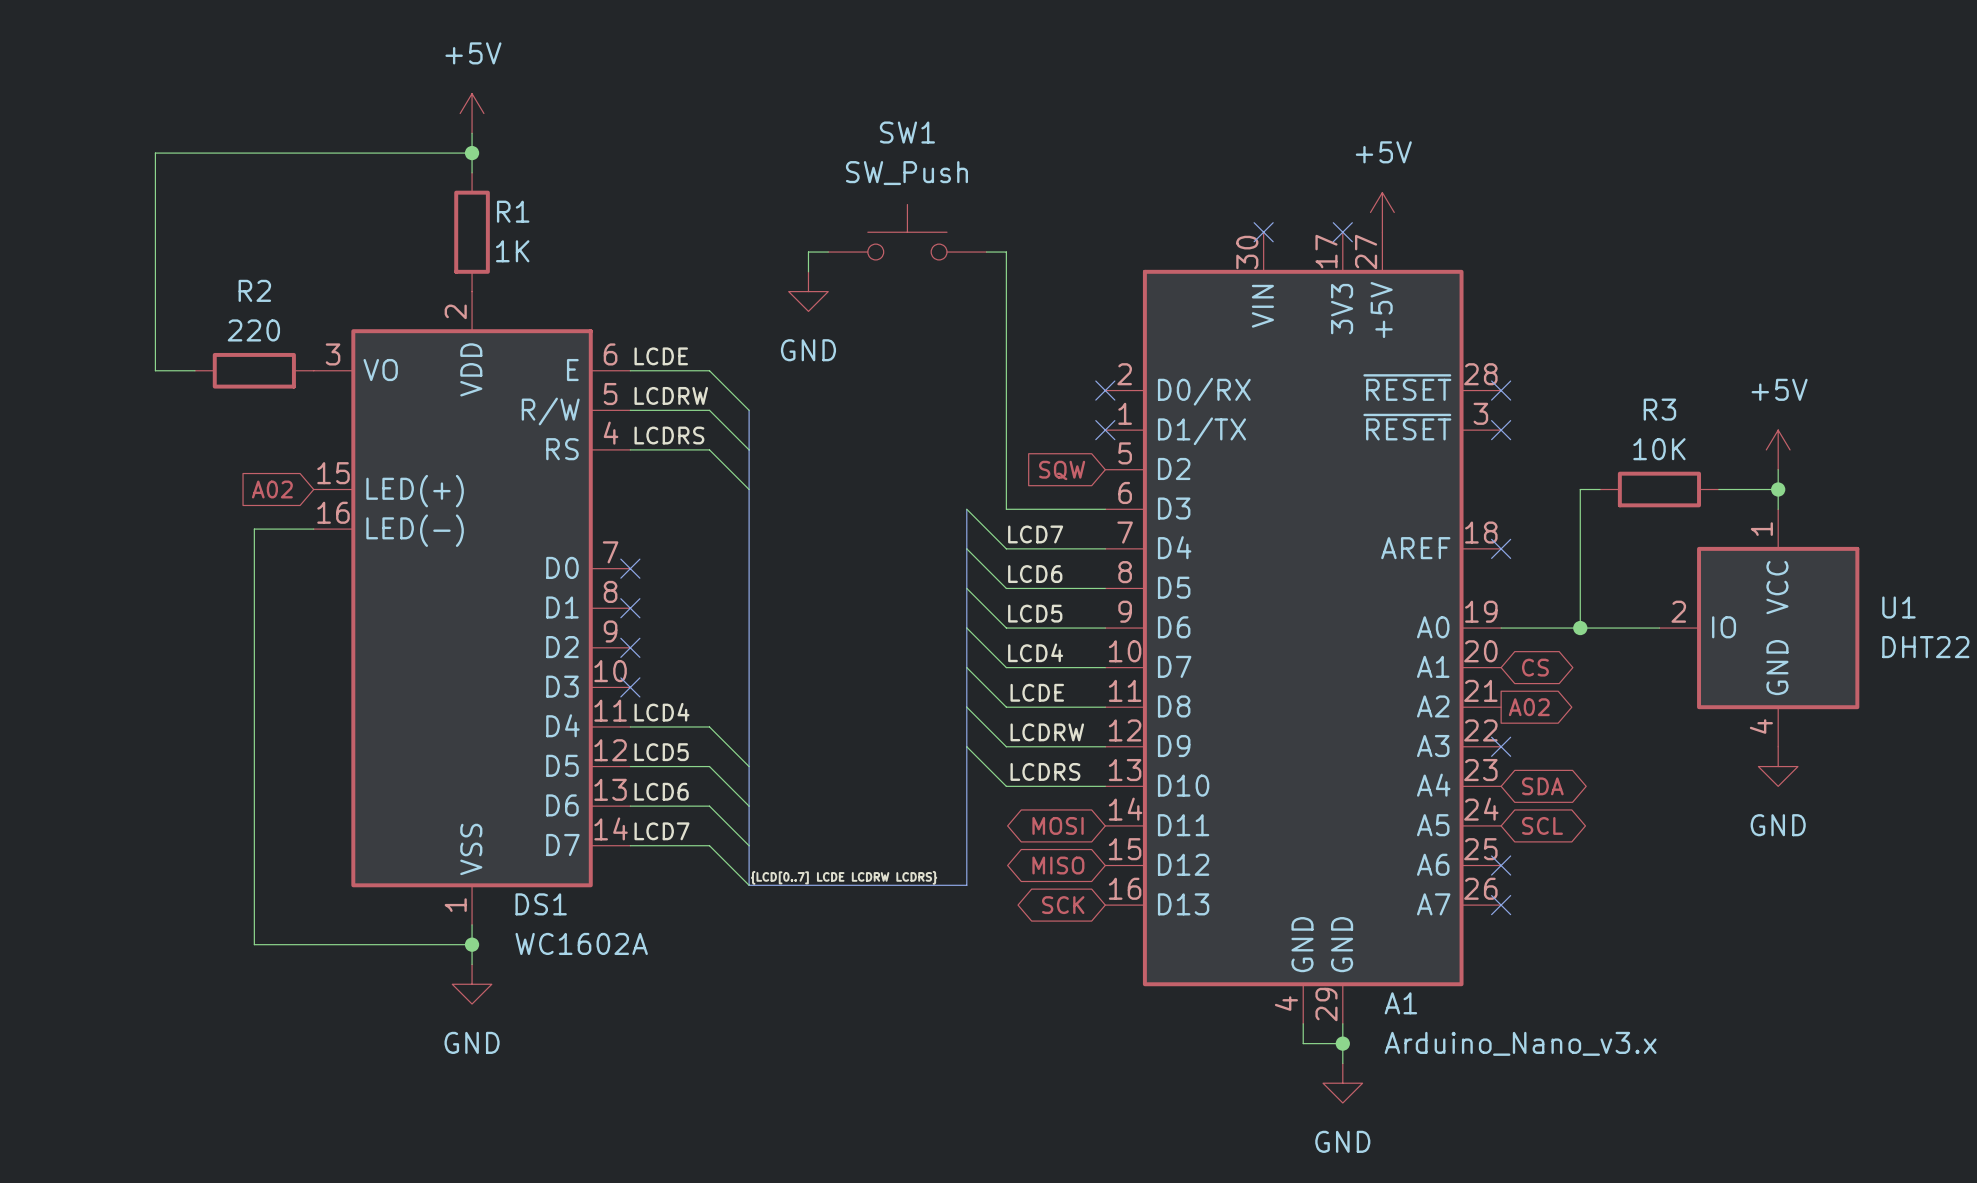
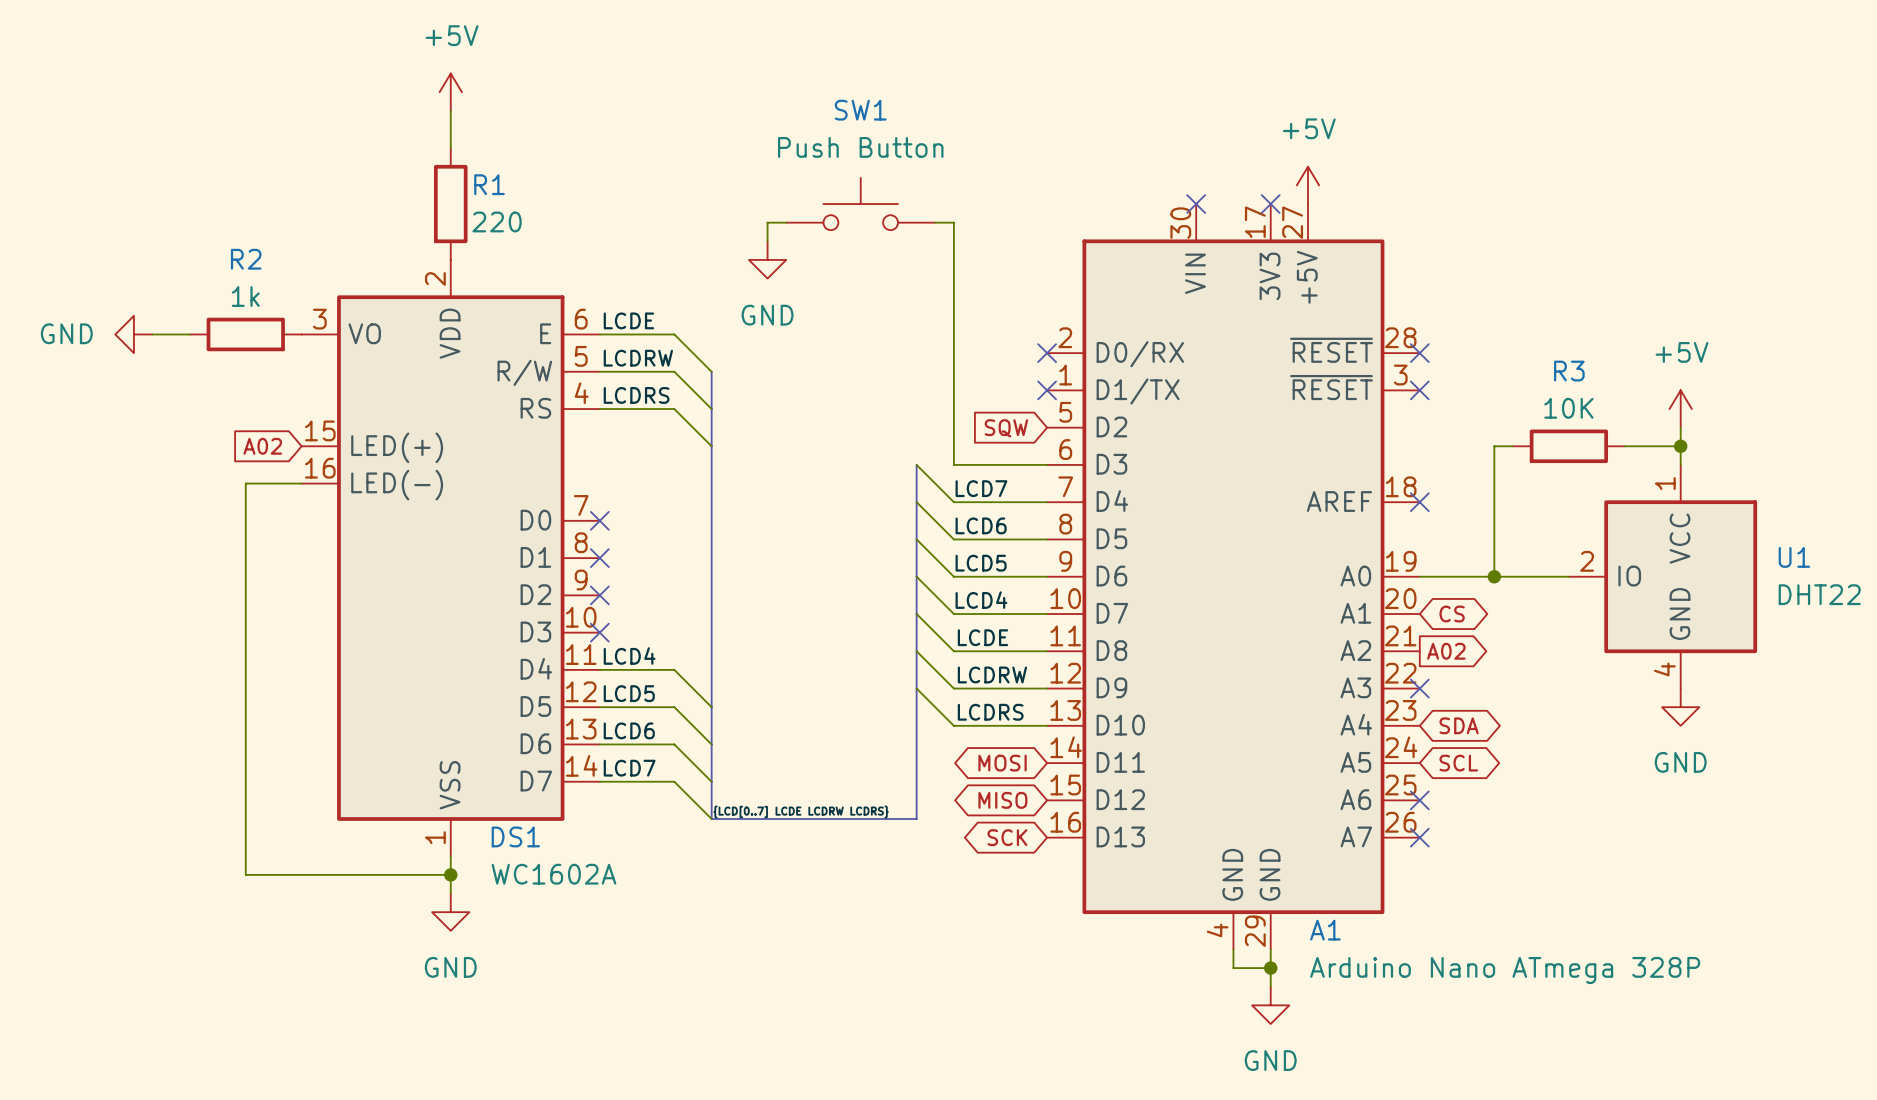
wire: (472, 153) (155, 153) (155, 370) -> none
junction: (472, 153) -> none
SW1 value: SW_Push (906, 173) -> Push Button (860, 147)
R1 value: 1K (512, 251) -> 220 (497, 221)
R2 value: 220 (253, 330) -> 1k (245, 296)
power symbol: none -> GND (133, 334)
A1 value: Arduino_Nano_v3.x (1520, 1043) -> Arduino Nano ATmega 328P (1505, 970)

